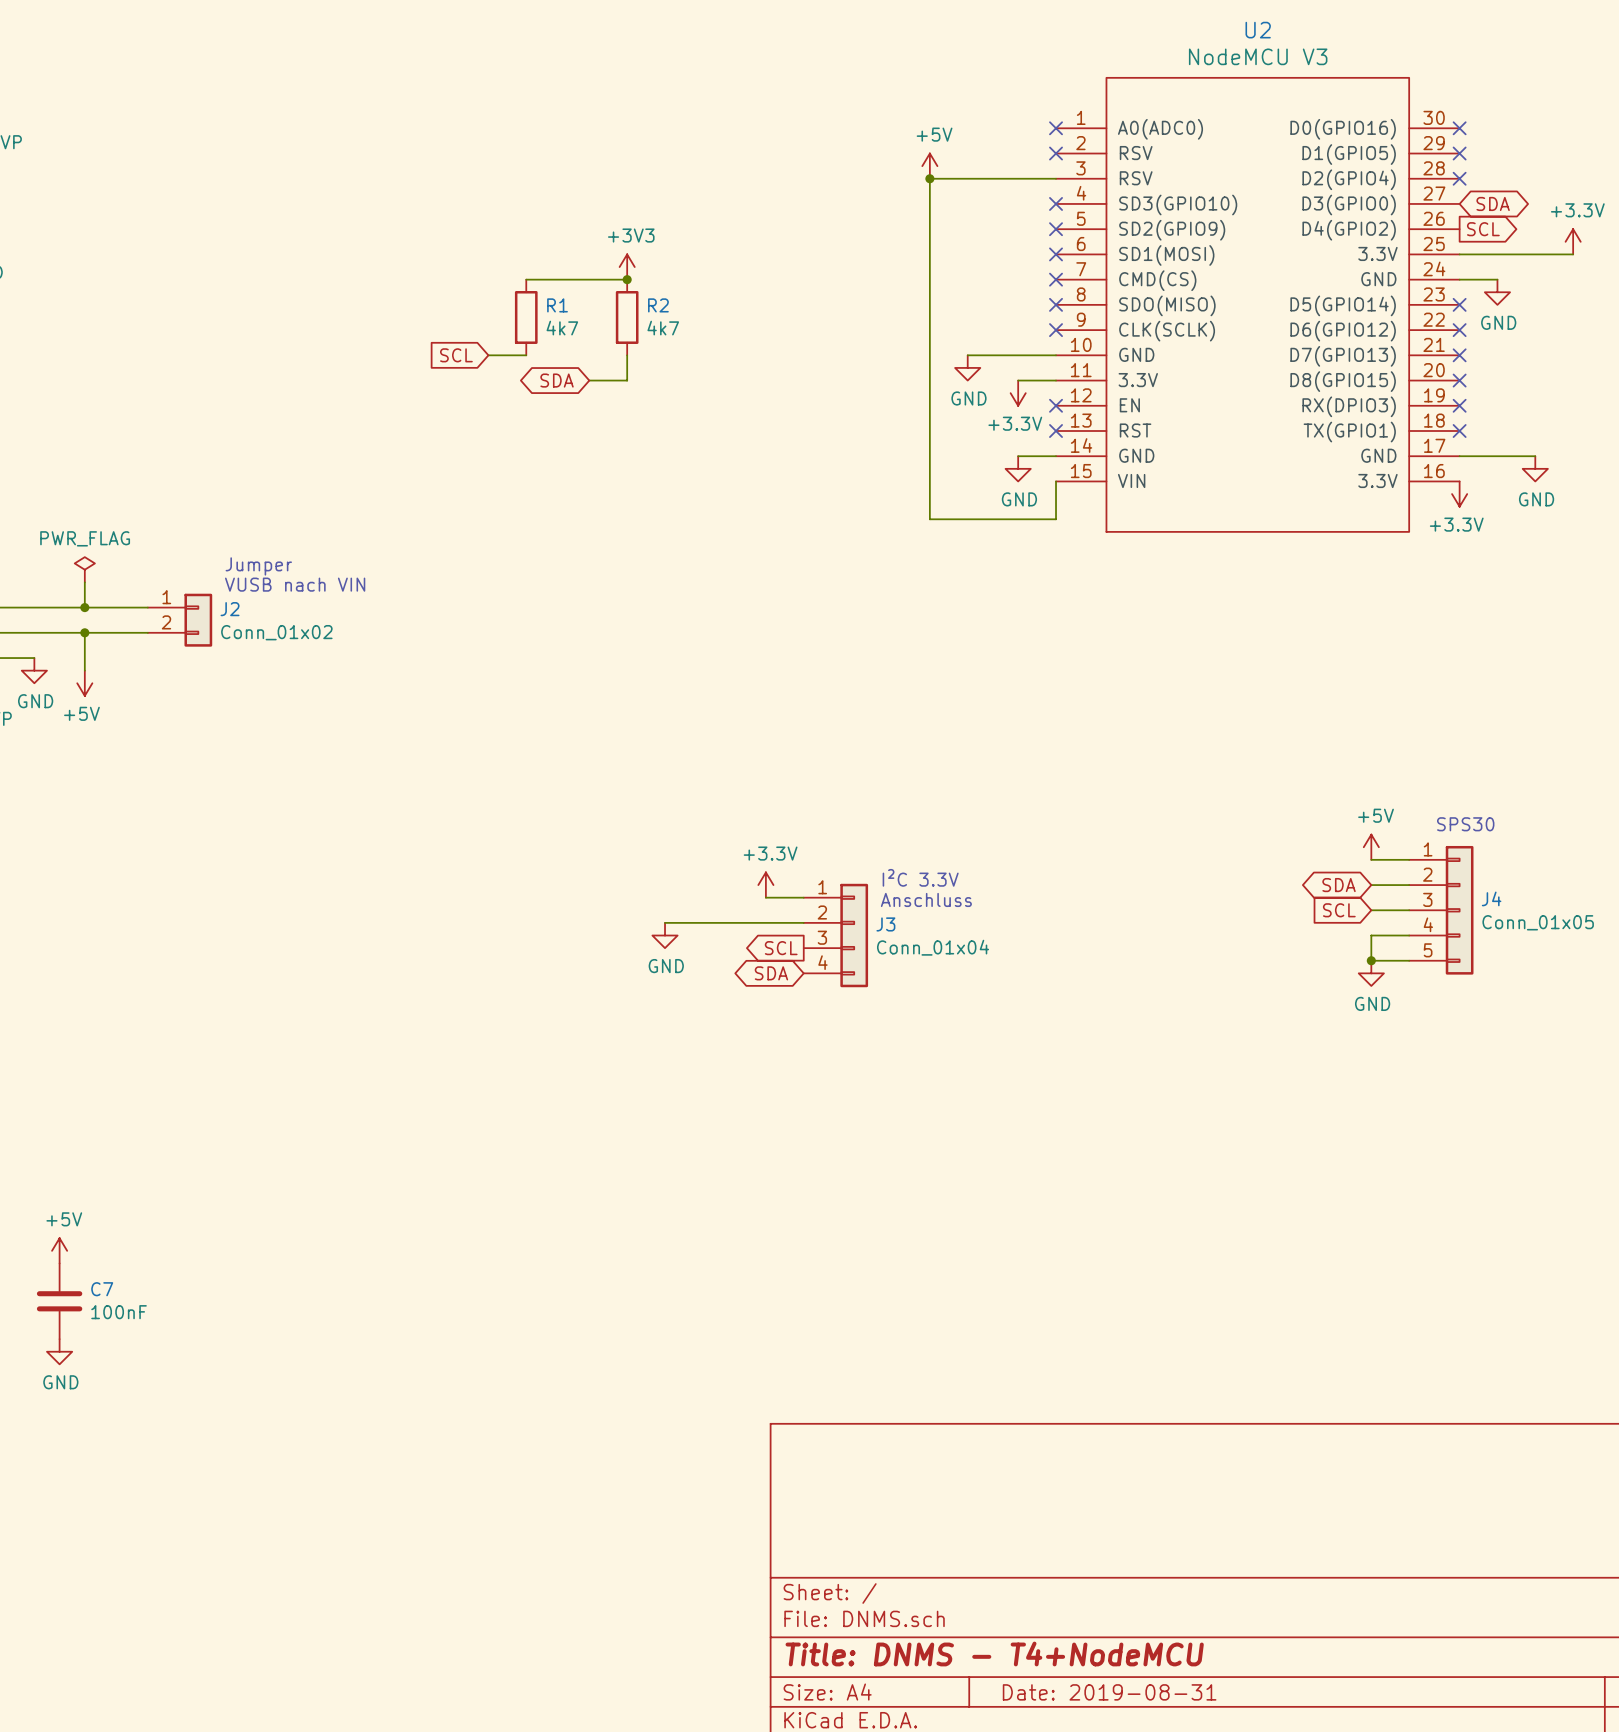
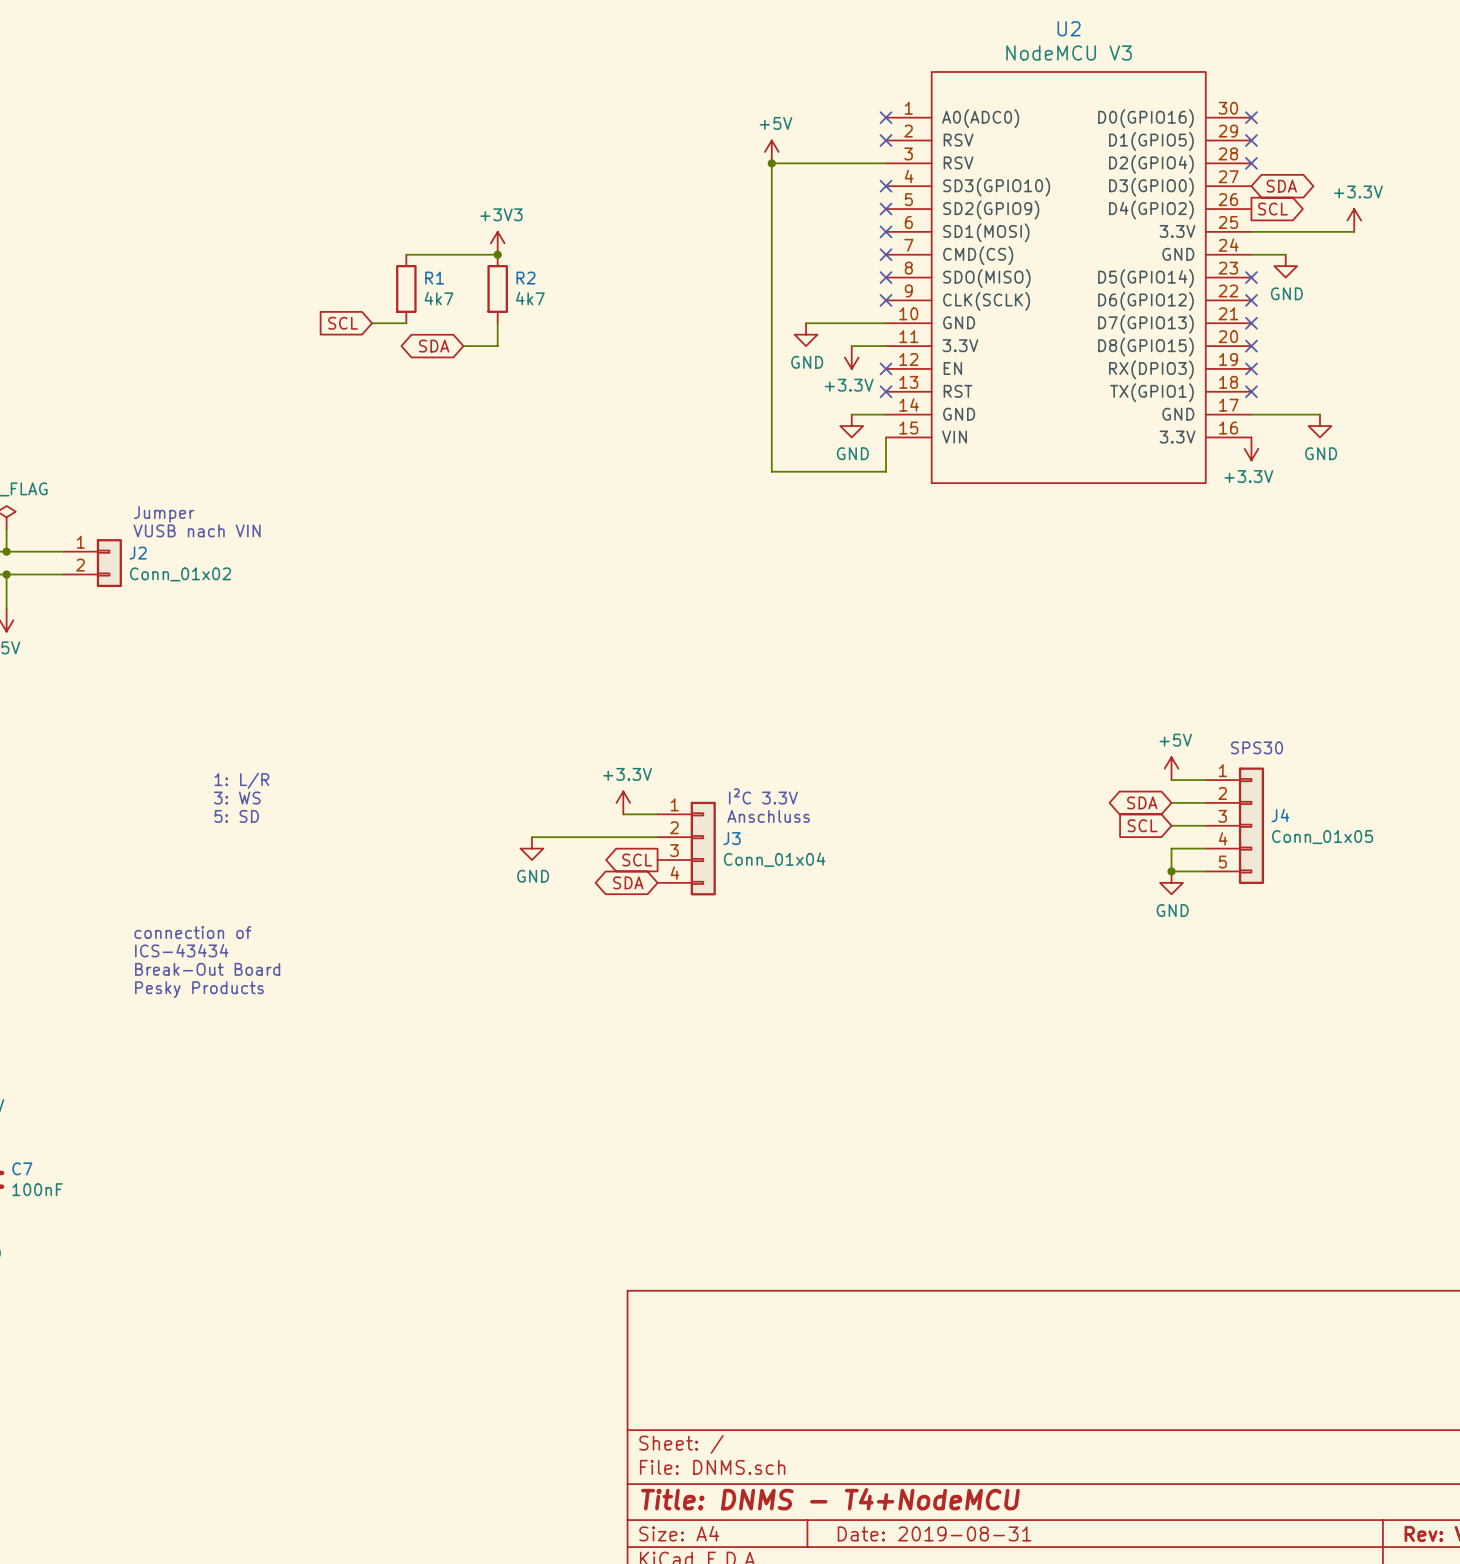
text: none -> 1: L/R (241, 780)
text: none -> 3: WS (237, 798)
text: none -> 5: SD (236, 816)
text: none -> connection of (192, 932)
text: none -> ICS-43434 (181, 950)
text: none -> Break-Out Board (207, 969)
text: none -> Pesky Products (199, 989)

